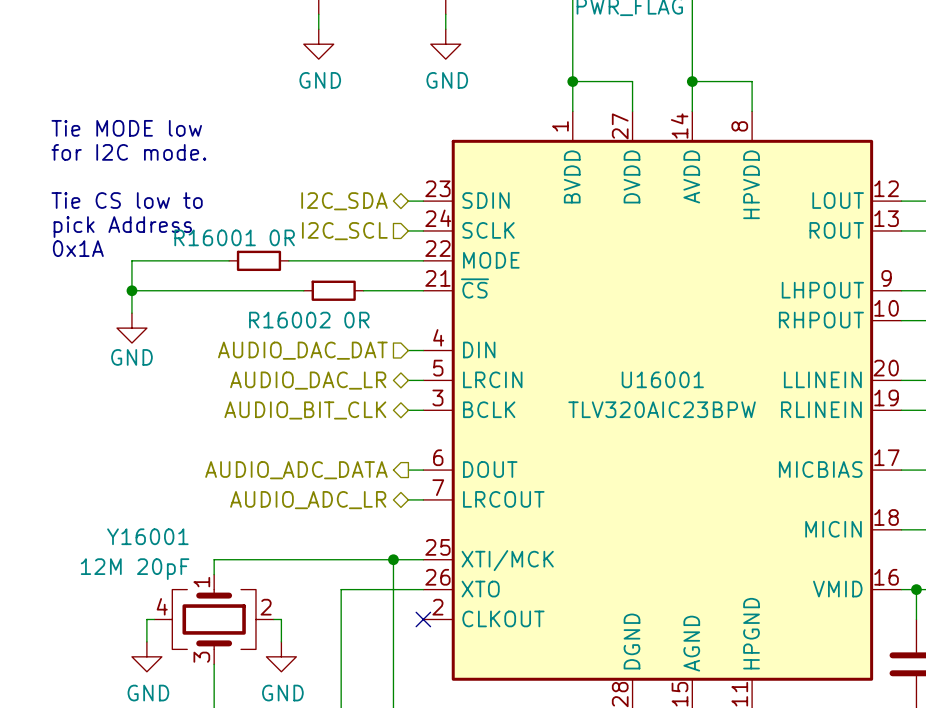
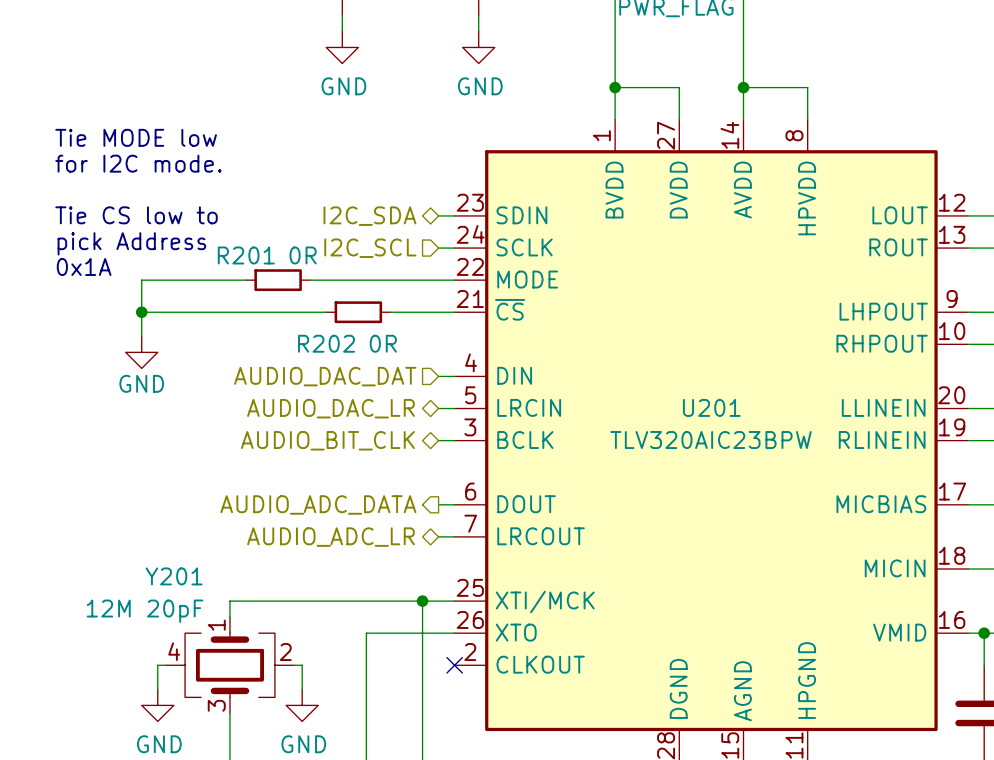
R16001 name: R16001 (215, 237) -> R201 (246, 255)
R16002 name: R16002 (289, 320) -> R202 (326, 343)
U16001 name: U16001 (662, 379) -> U201 (711, 407)
Y16001 name: Y16001 (147, 536) -> Y201 (174, 576)

